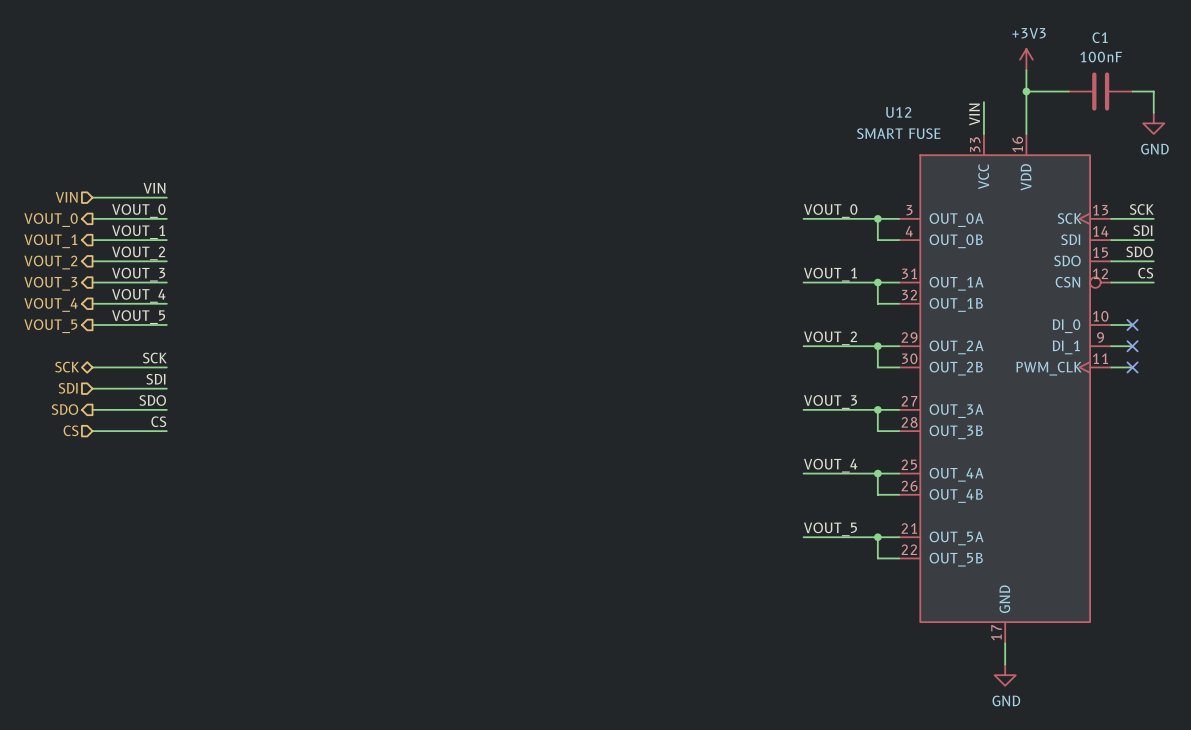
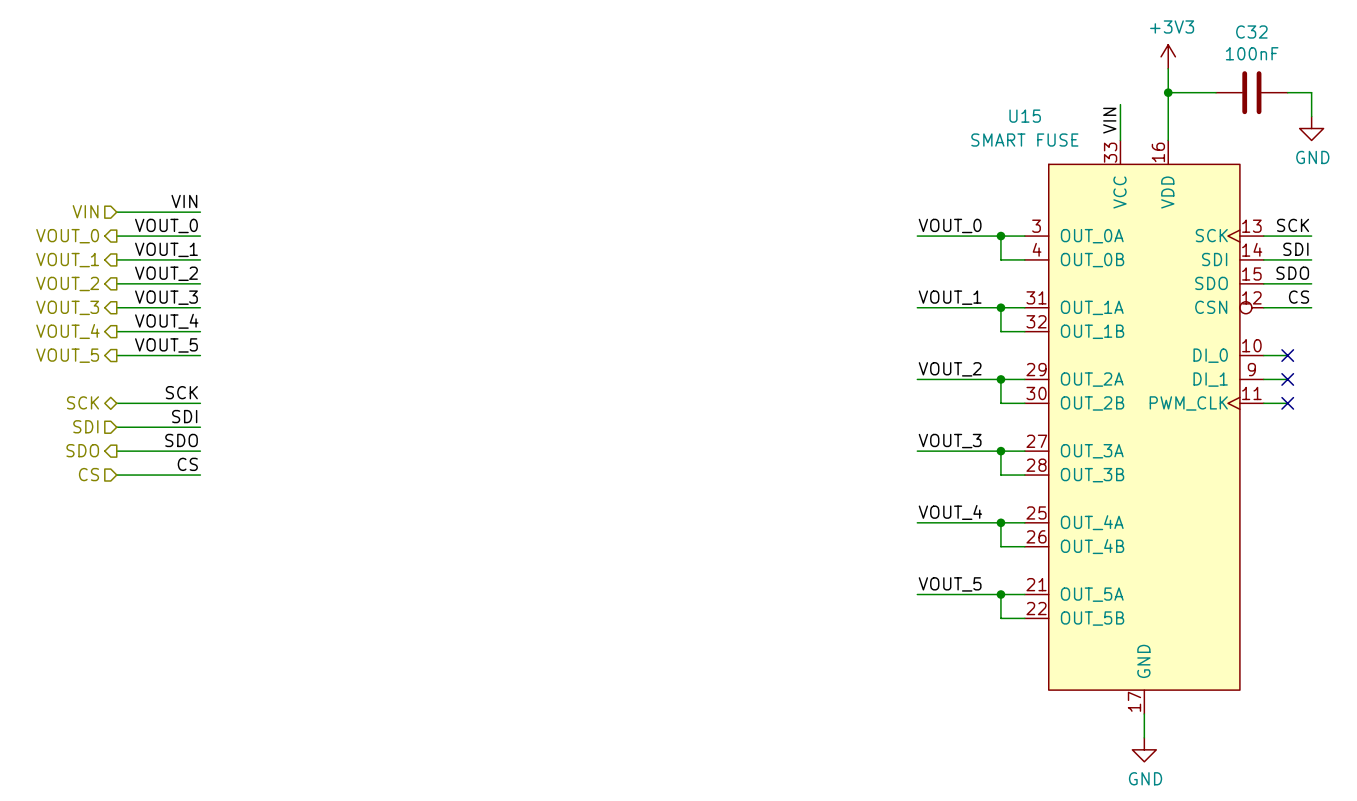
C1 name: C1 (1100, 37) -> C32 (1251, 32)
U12 name: U12 (898, 112) -> U15 (1025, 116)

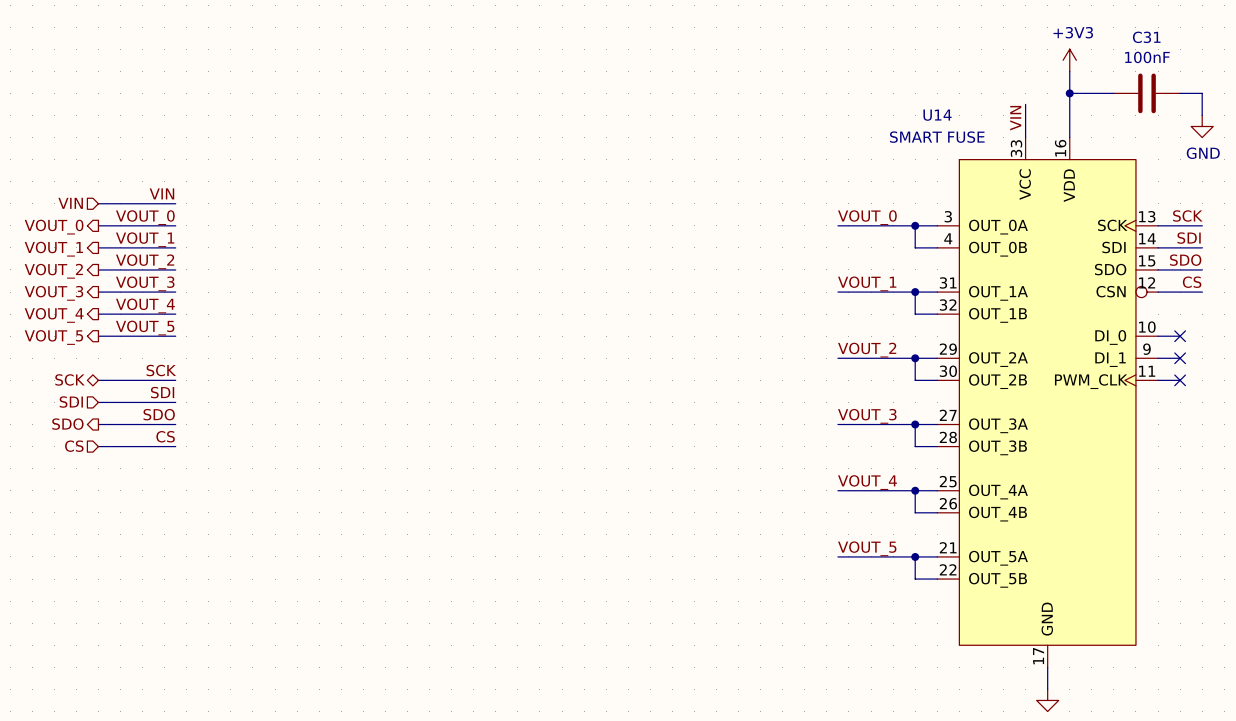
C32 name: C32 (1251, 32) -> C31 (1146, 37)
U15 name: U15 (1025, 116) -> U14 (937, 115)

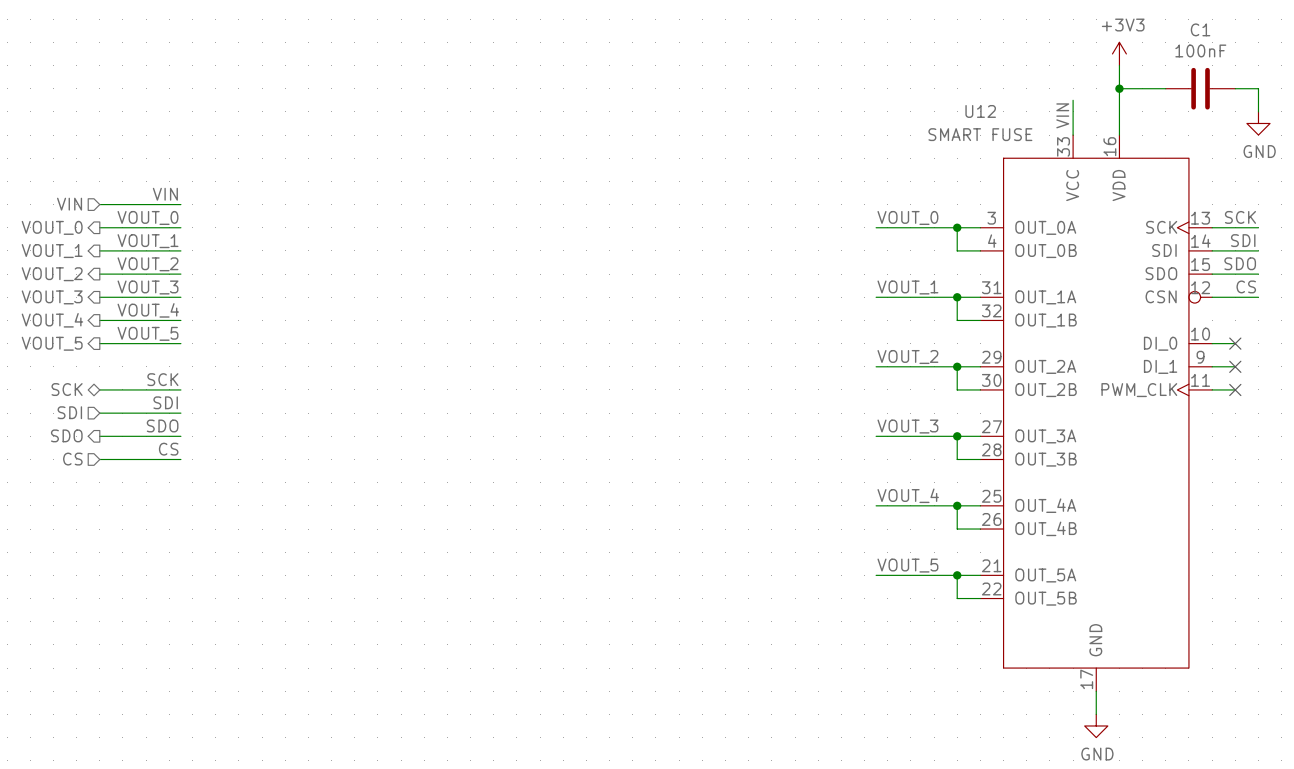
C31 name: C31 (1146, 37) -> C1 (1200, 29)
U14 name: U14 (937, 115) -> U12 (980, 111)

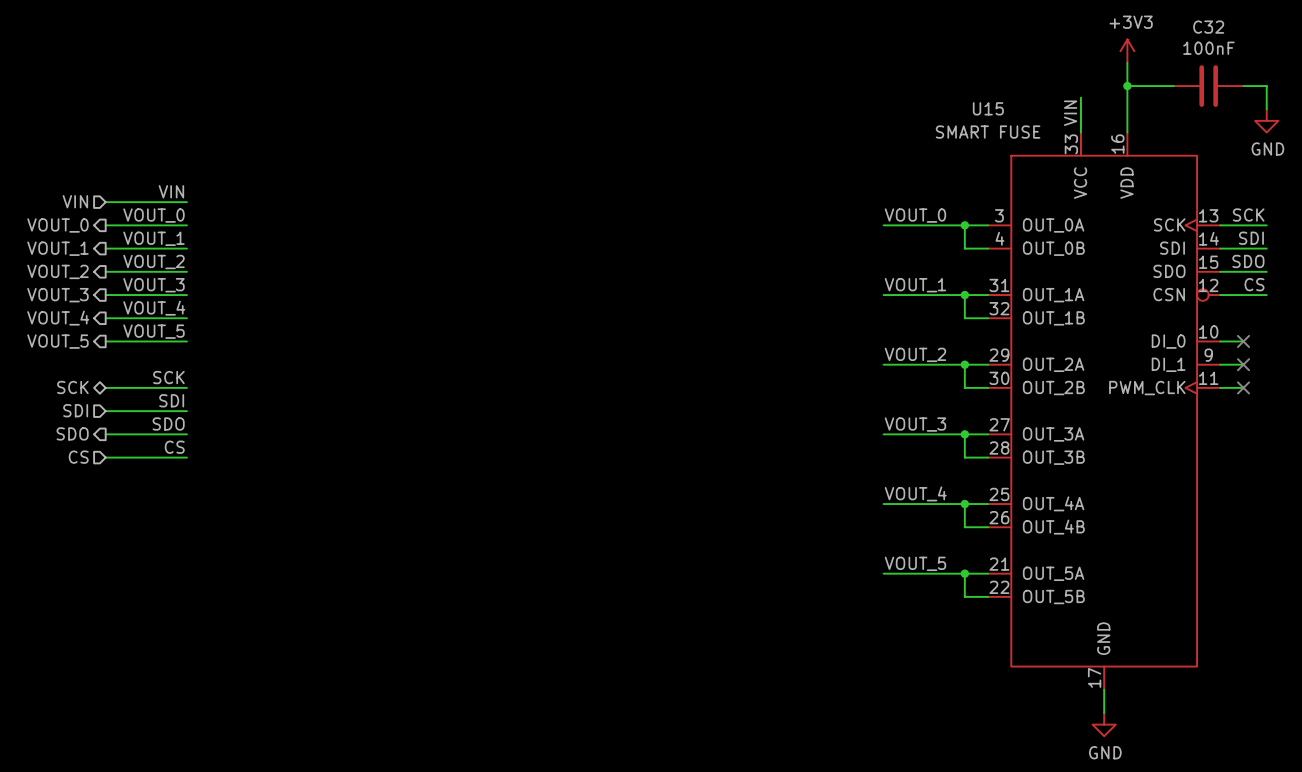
C1 name: C1 (1200, 29) -> C32 (1208, 27)
U12 name: U12 (980, 111) -> U15 (988, 108)

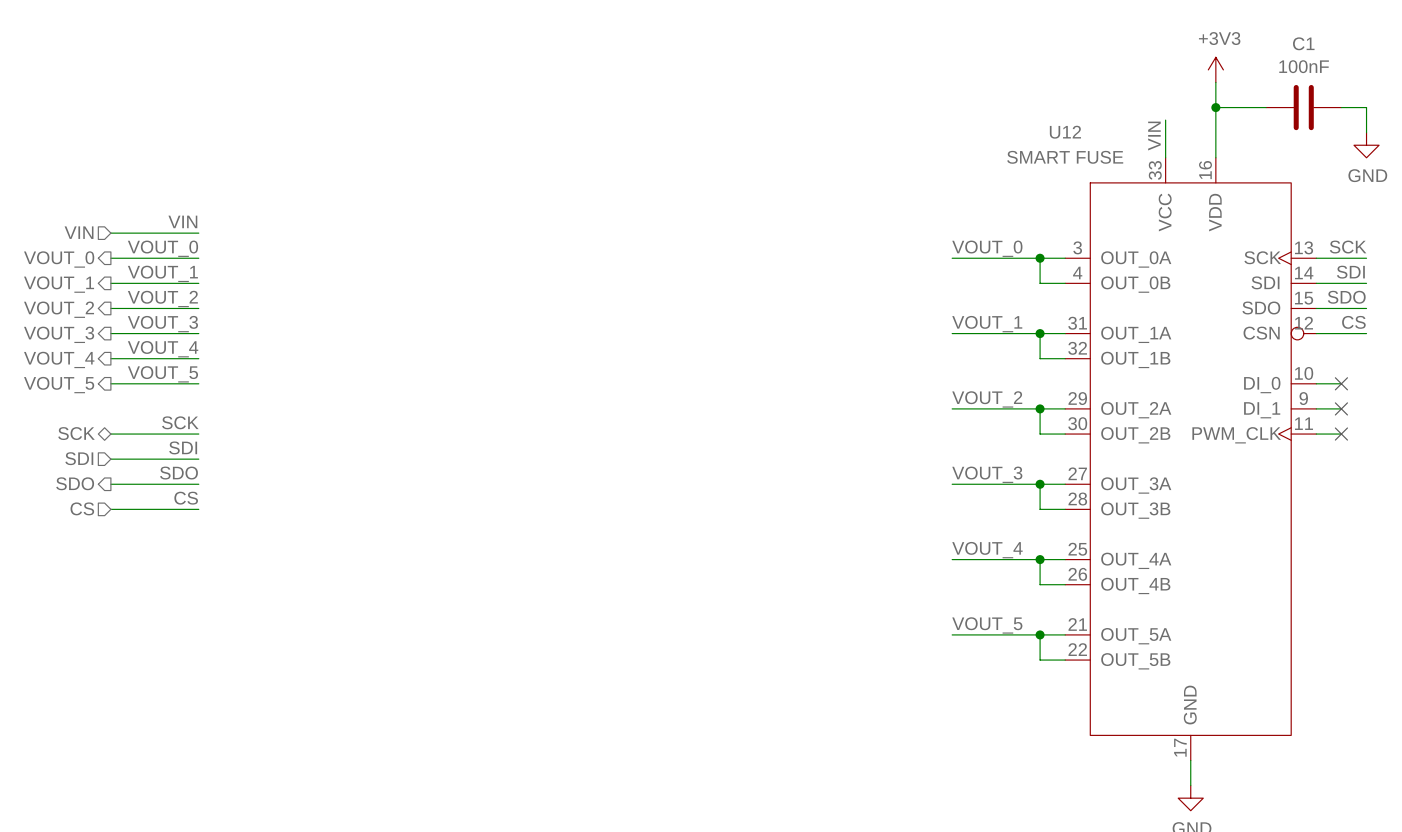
C32 name: C32 (1208, 27) -> C1 (1303, 43)
U15 name: U15 (988, 108) -> U12 (1065, 132)

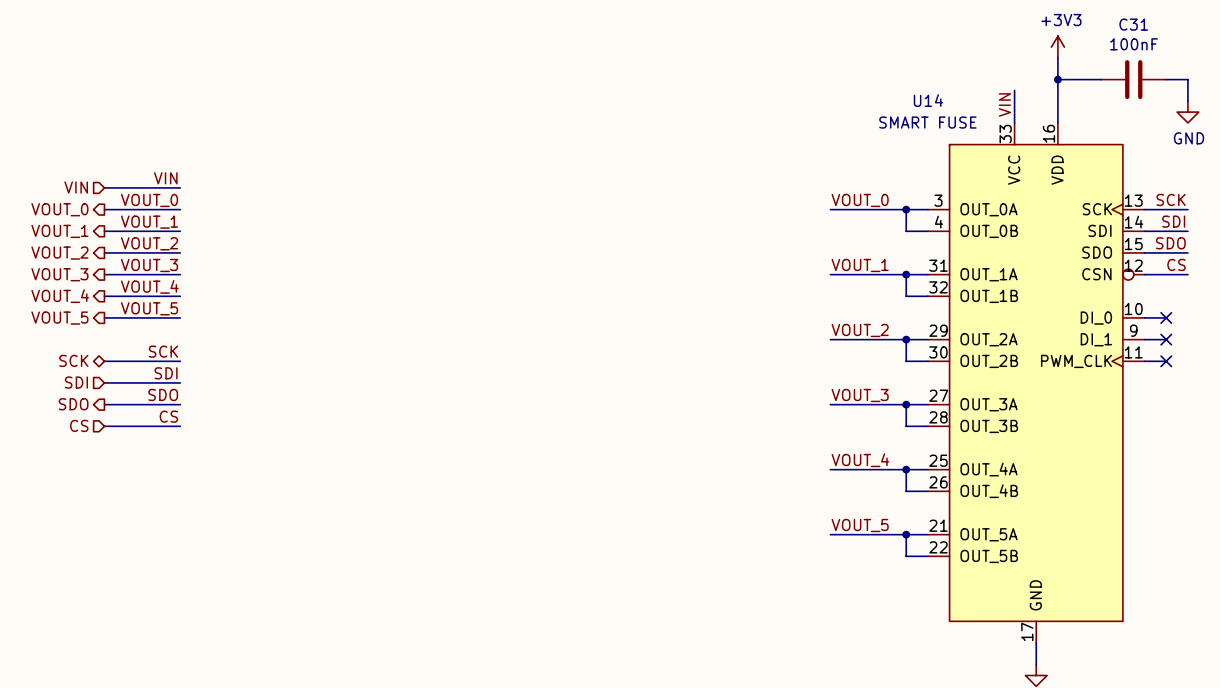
C1 name: C1 (1303, 43) -> C31 (1133, 24)
U12 name: U12 (1065, 132) -> U14 (928, 100)

